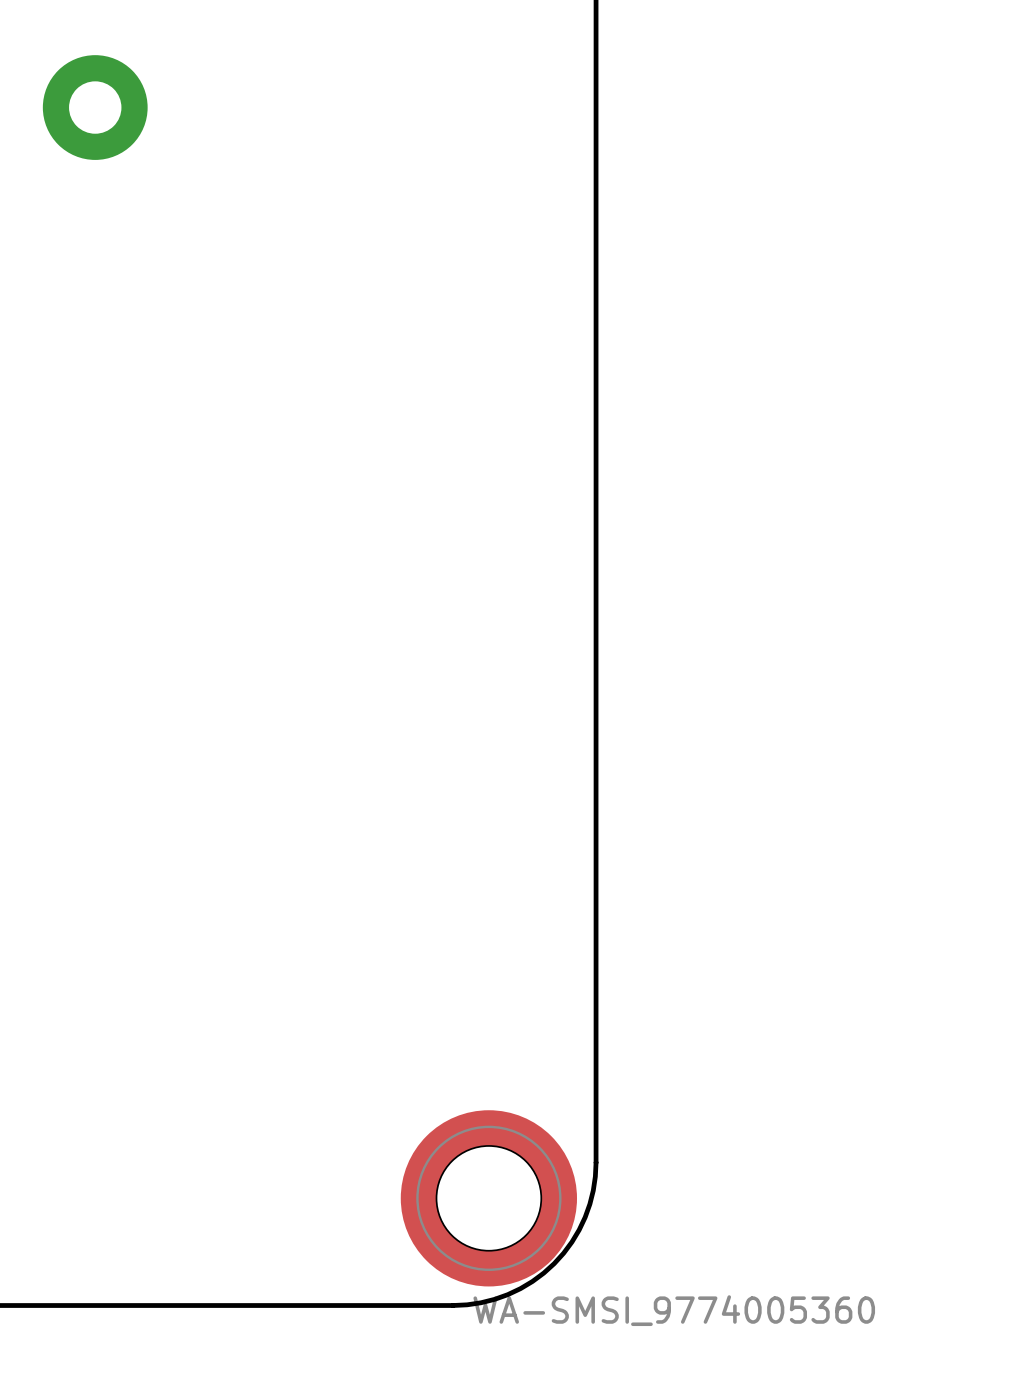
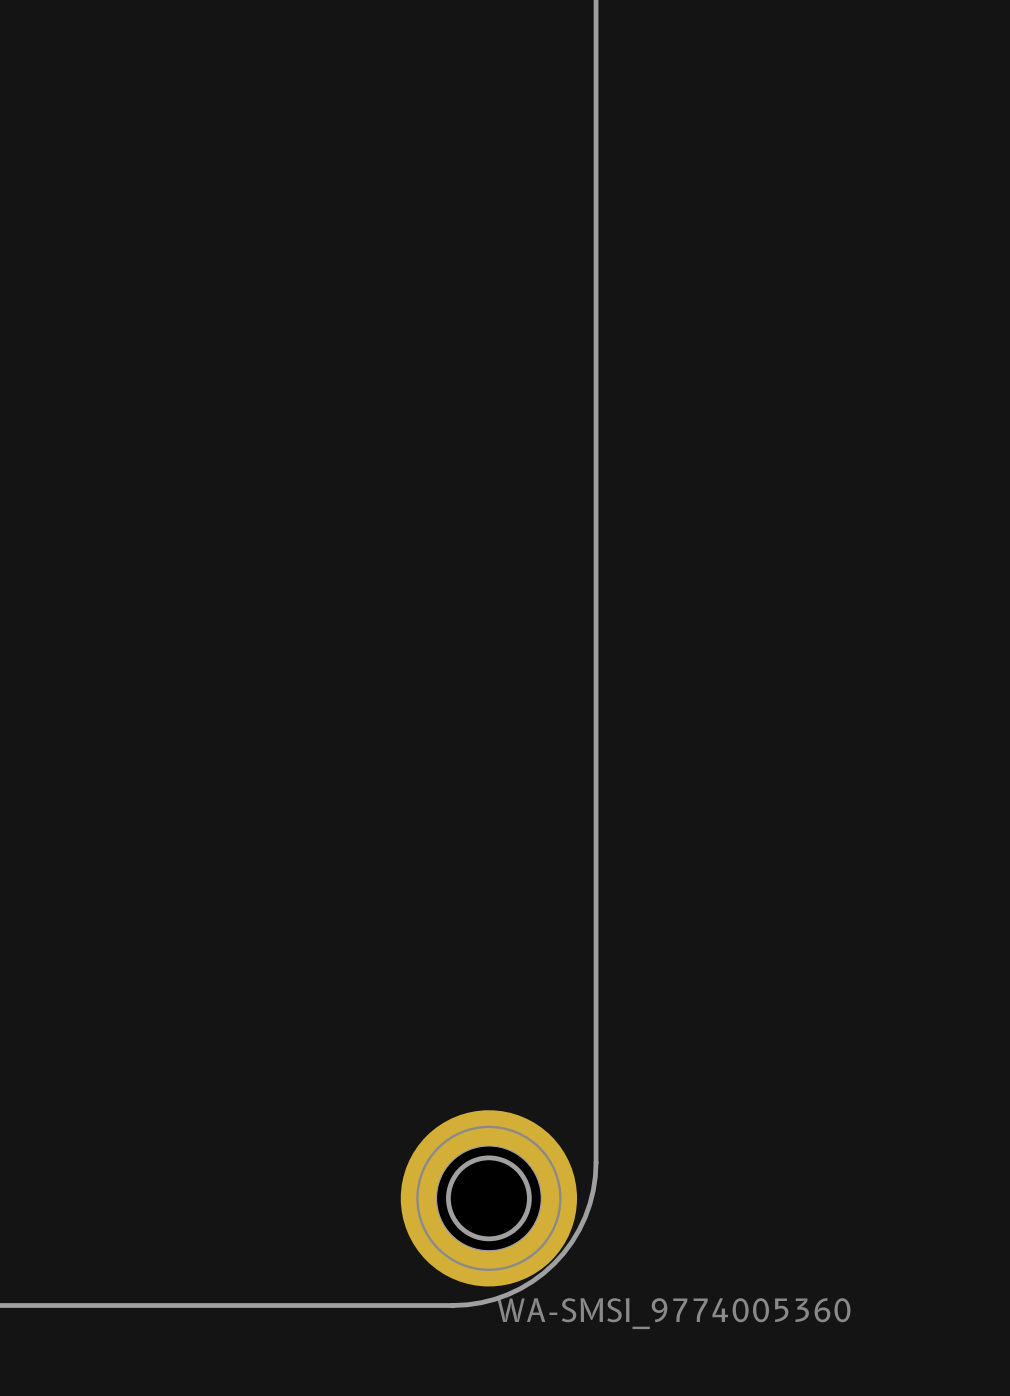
part: (95, 107) -> none
round board edge: none -> [446, 1155, 532, 1242]

